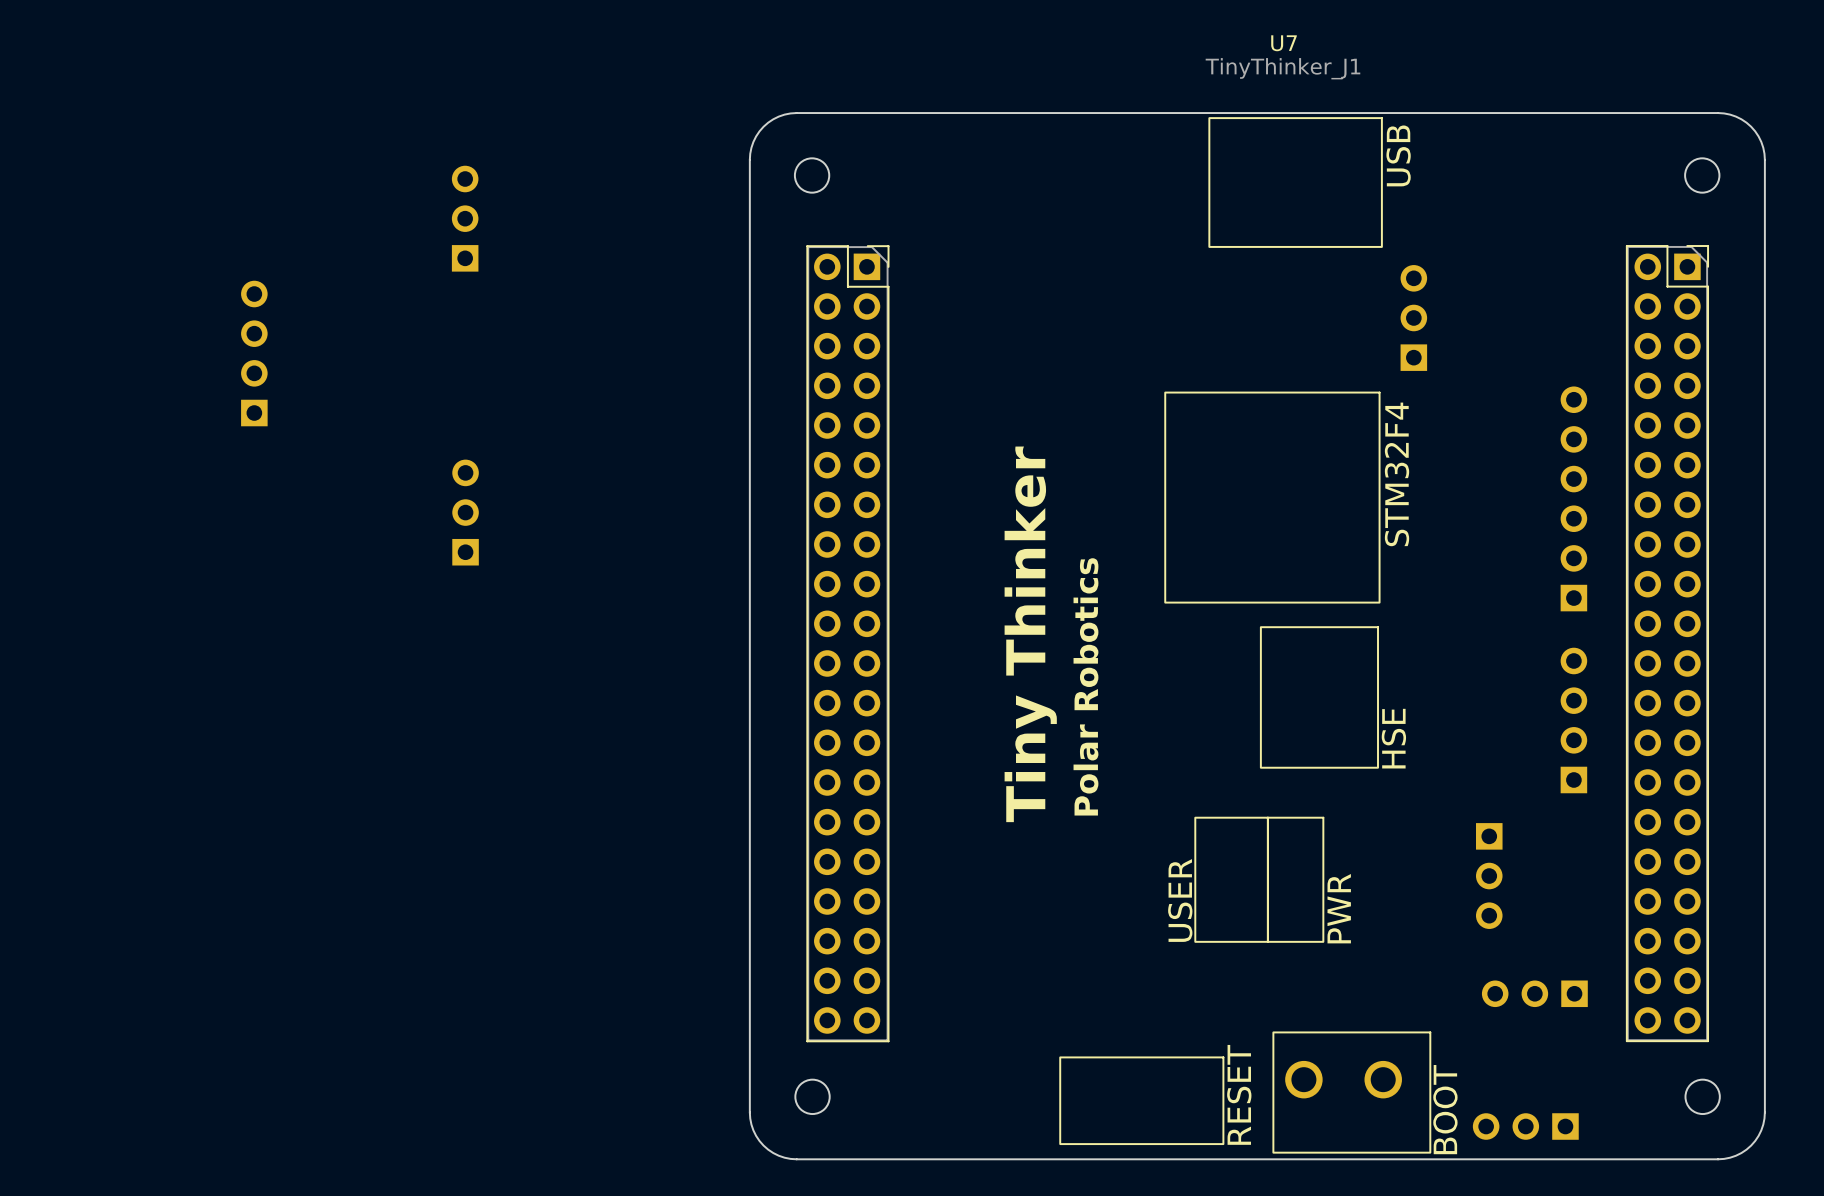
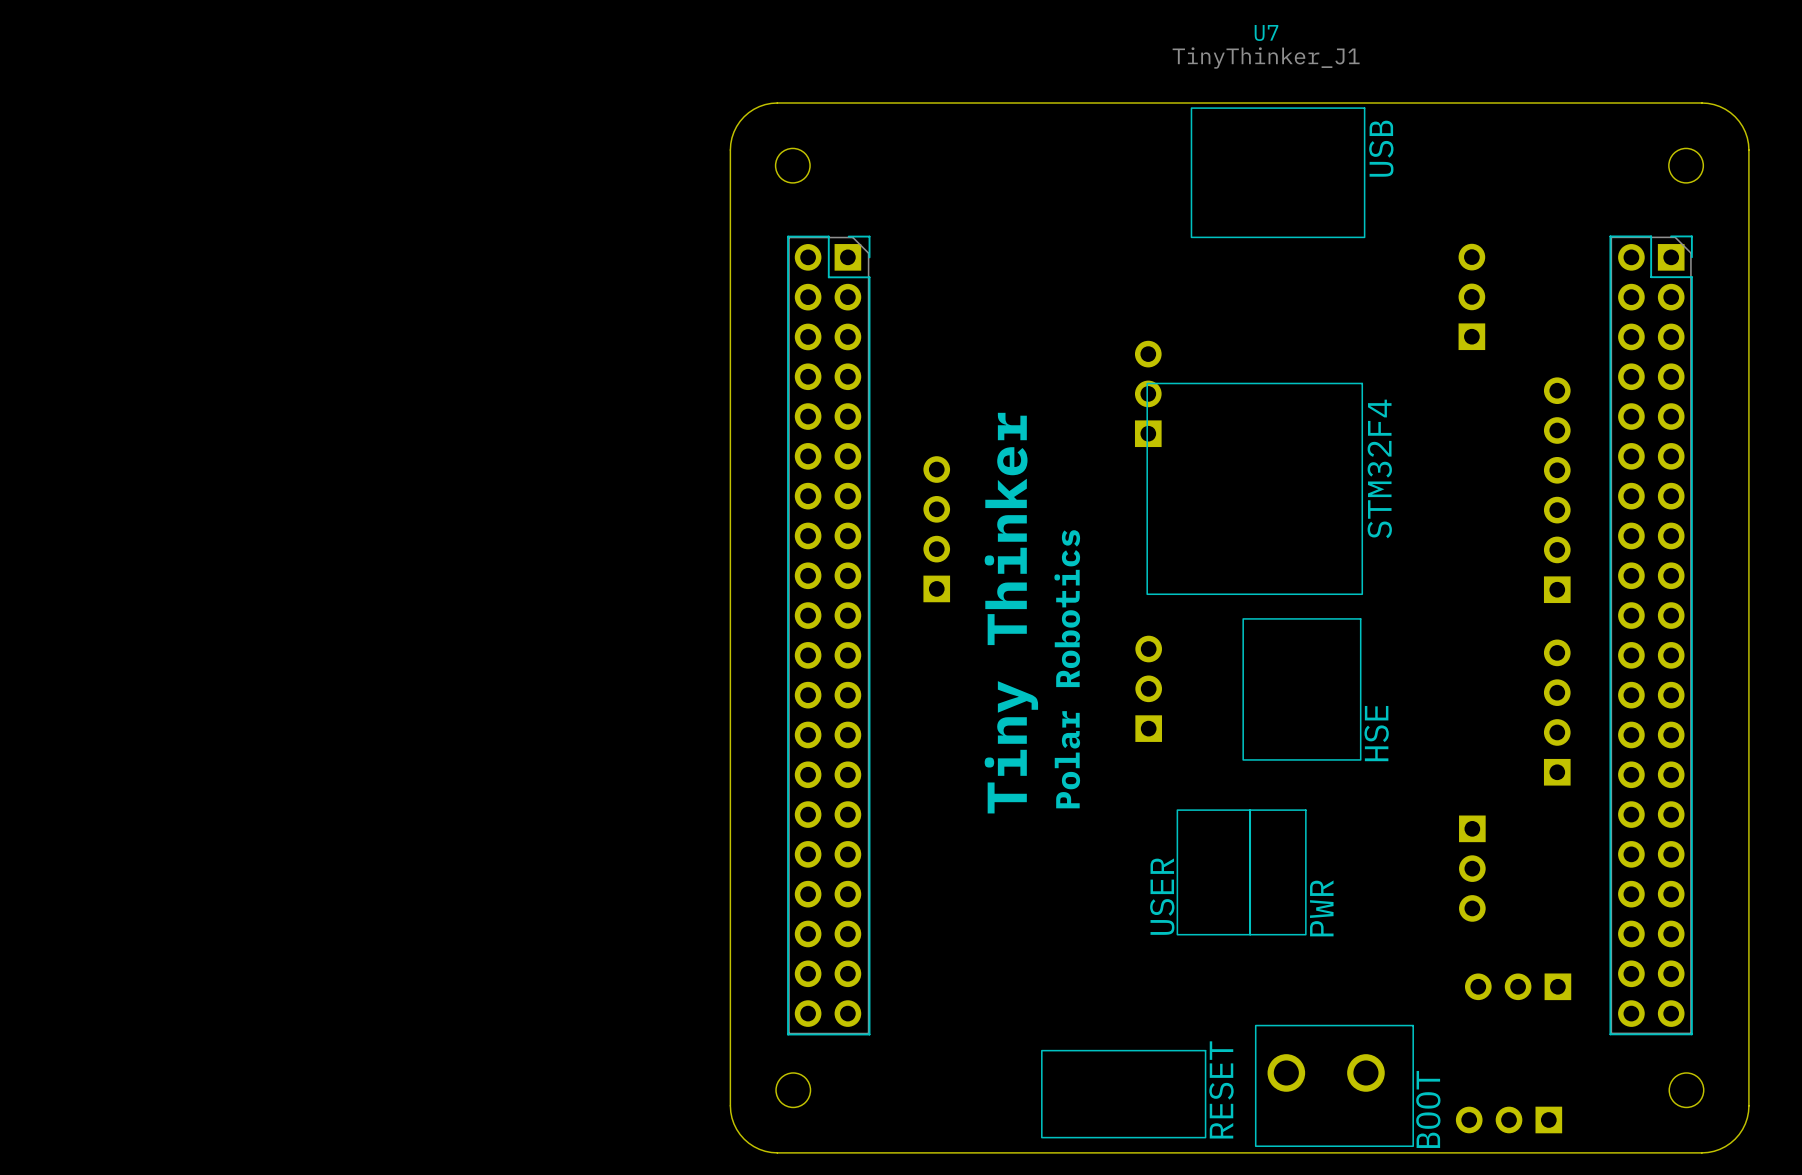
part: (465, 218) -> none
part position: (1413, 317) -> (1471, 296)
part: (254, 353) -> none
part: none -> (1148, 393)
part: (465, 512) -> none
part: none -> (936, 529)
part: none -> (1148, 688)

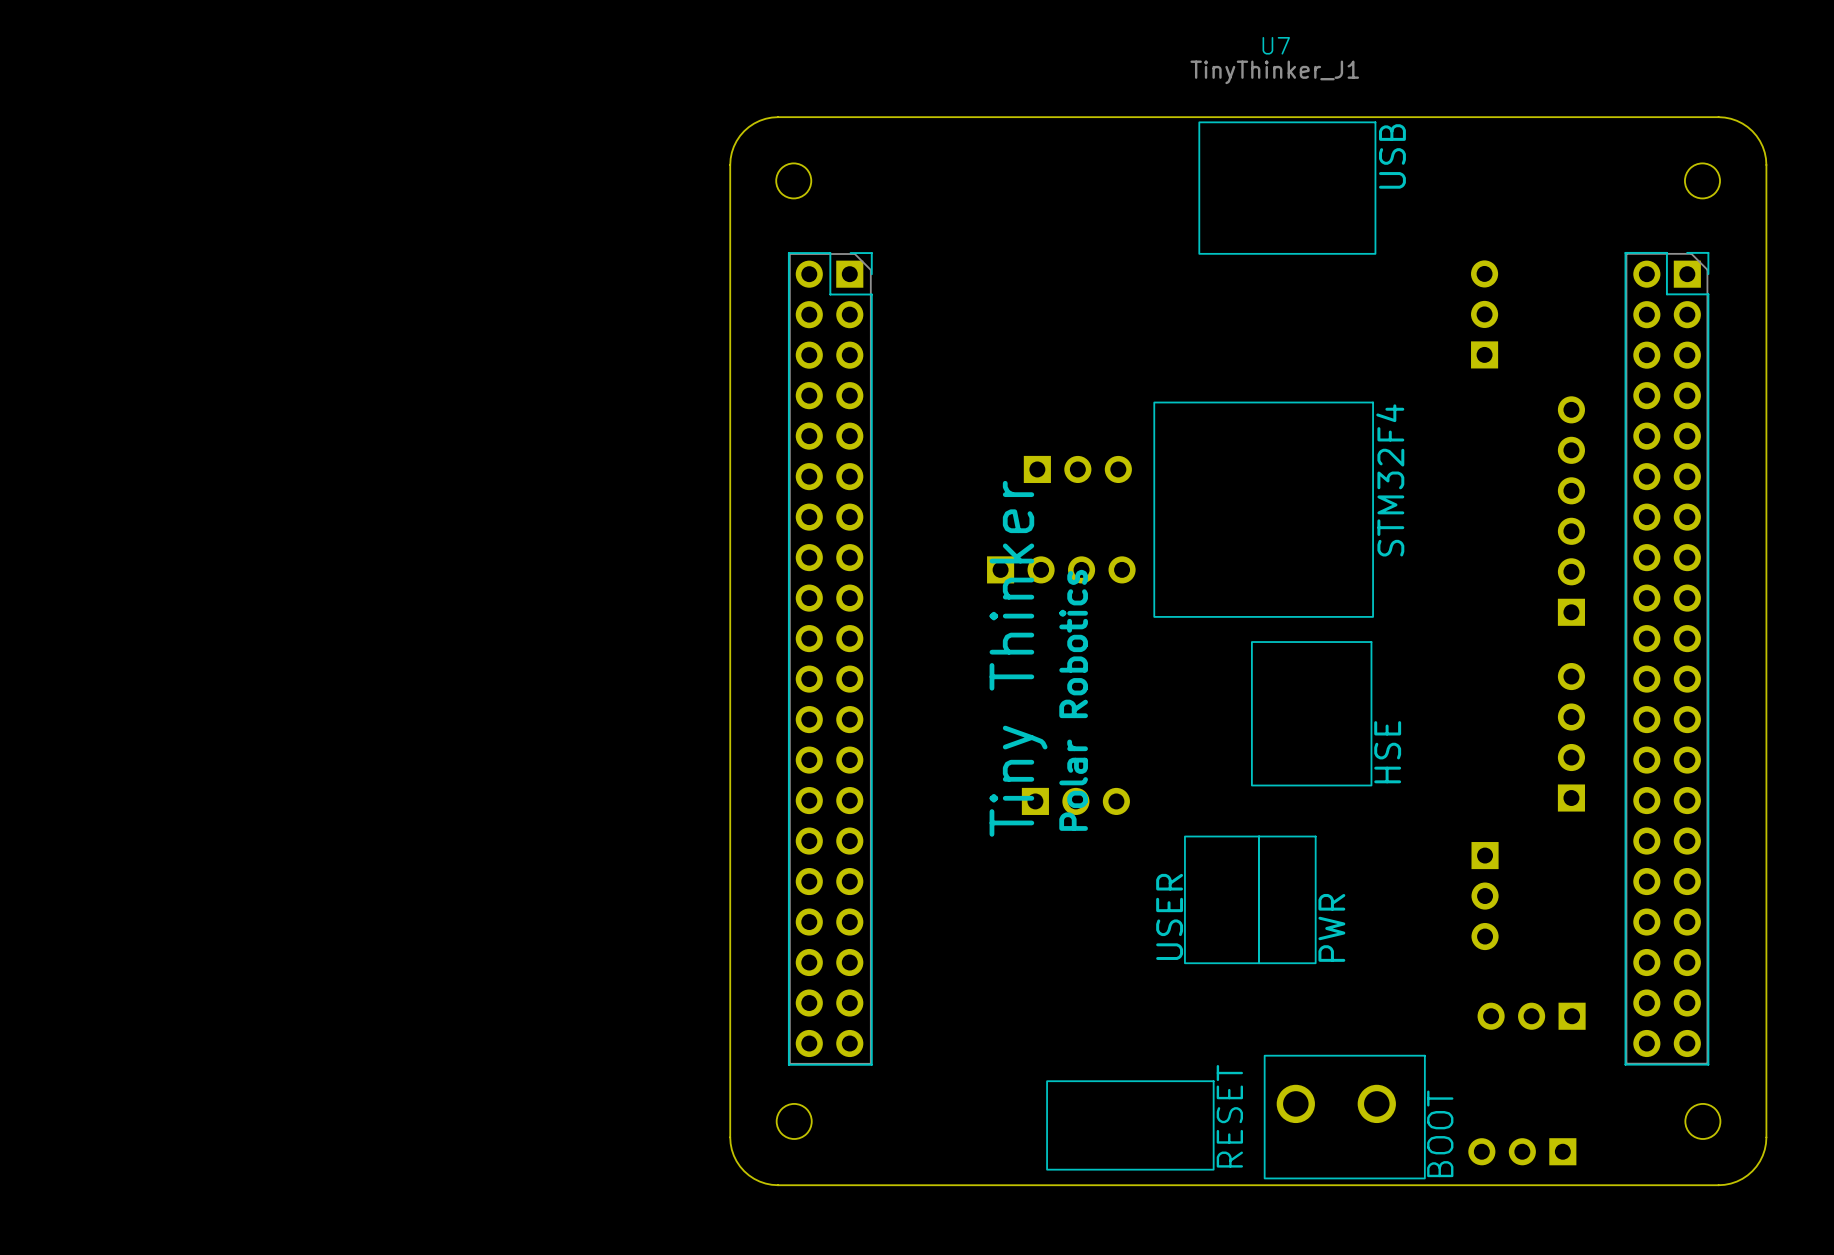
part rotation: 0° (1148, 393) -> 90° clockwise (1077, 469)
part position: (1148, 393) -> (1077, 469)
part rotation: 0° (936, 529) -> 90° clockwise (1061, 569)
part position: (936, 529) -> (1061, 569)
part rotation: 0° (1148, 688) -> 90° clockwise (1075, 801)
part position: (1148, 688) -> (1075, 801)

